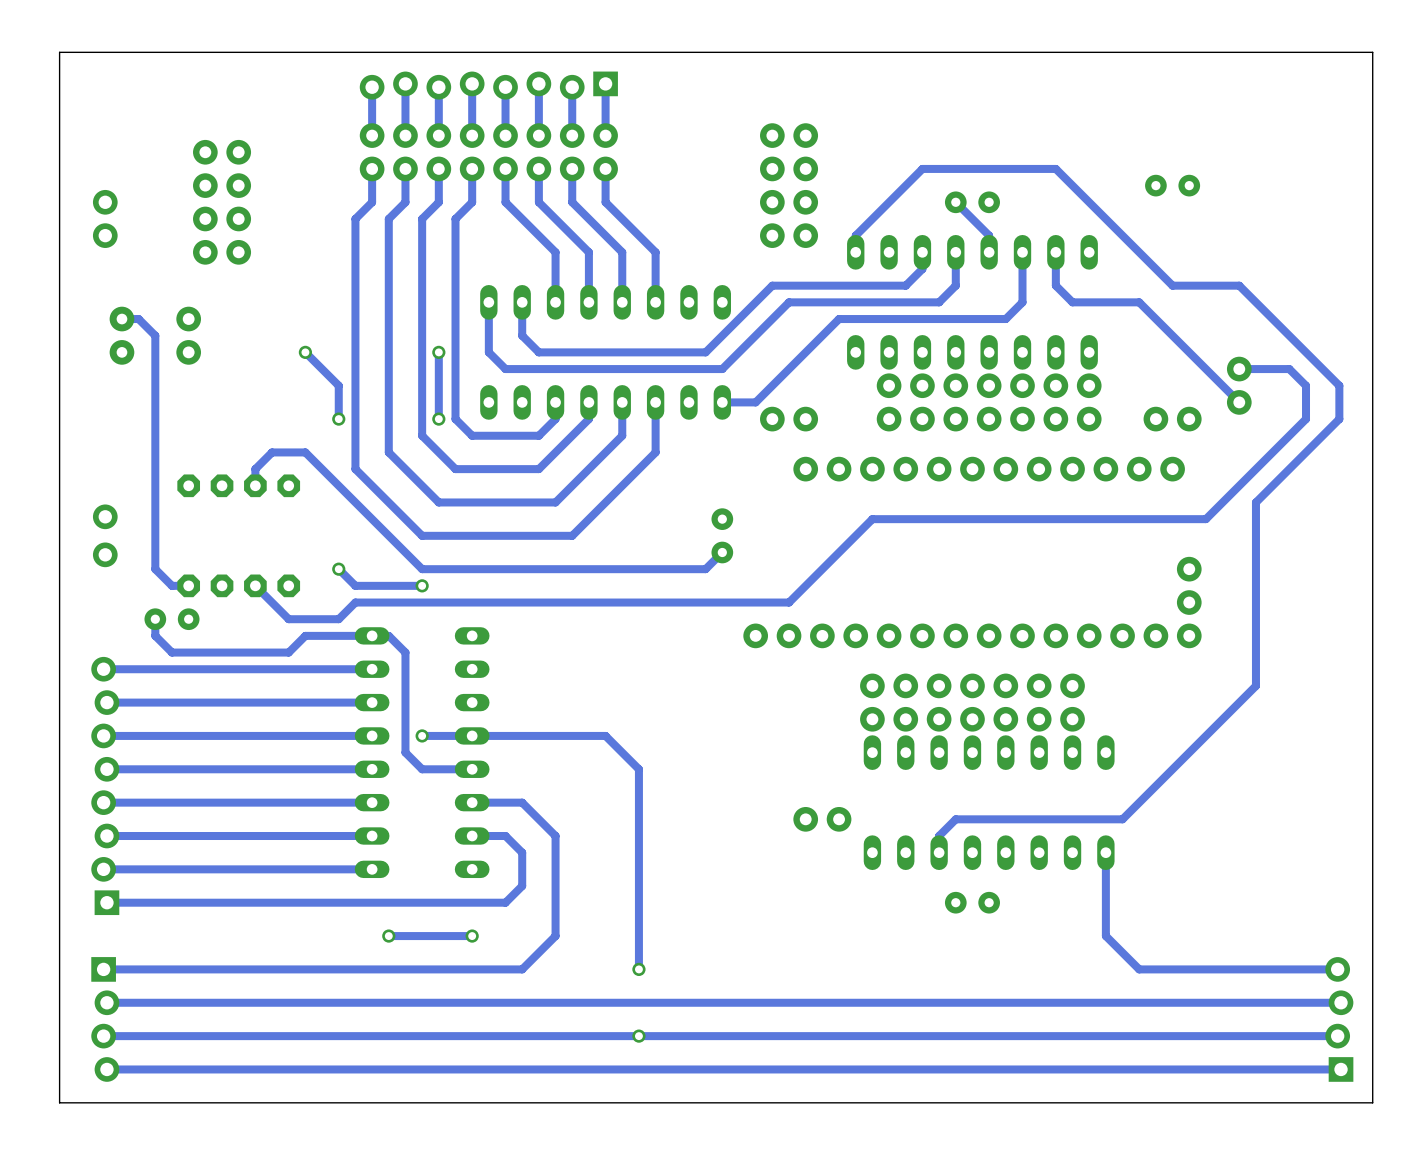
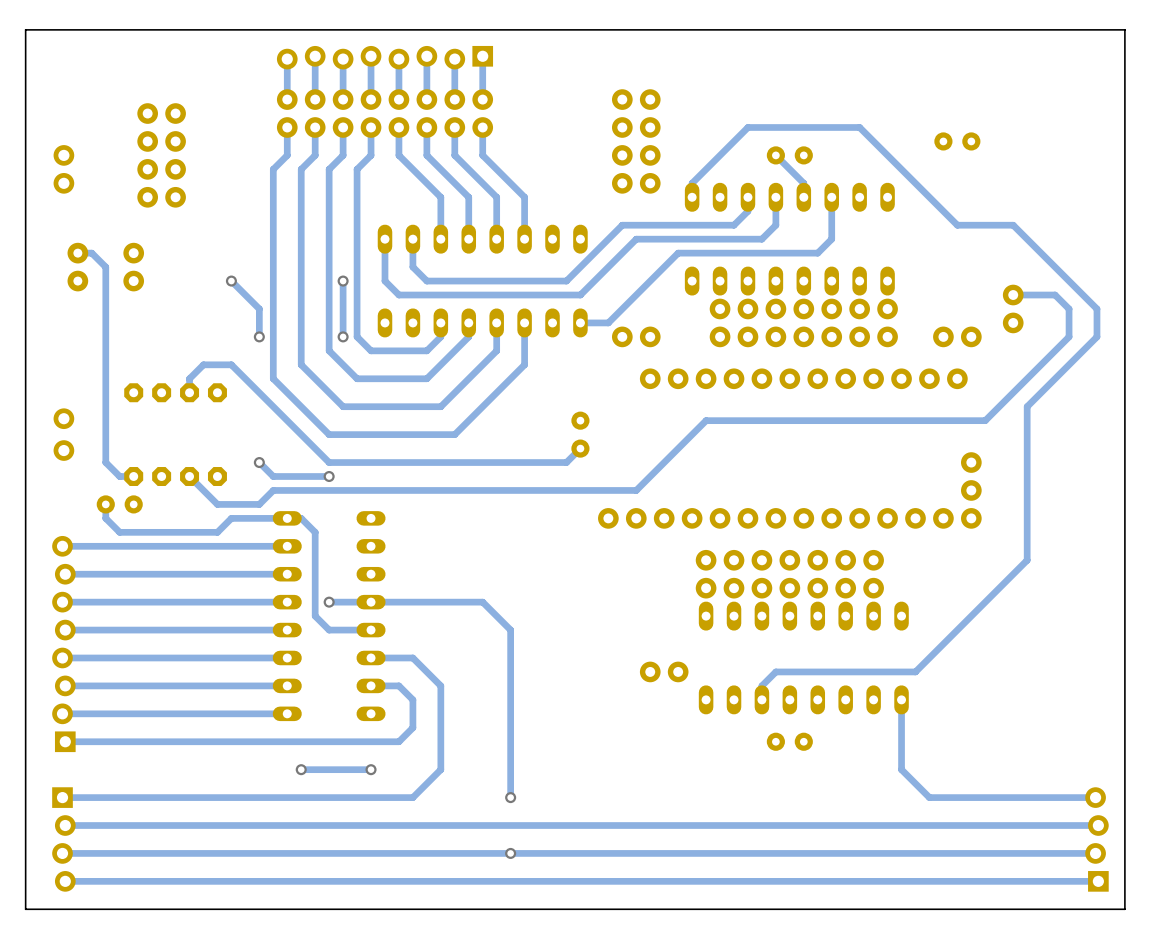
track: (1055, 252) (1055, 285) (1072, 302) (1139, 302) (1239, 402) -> none

